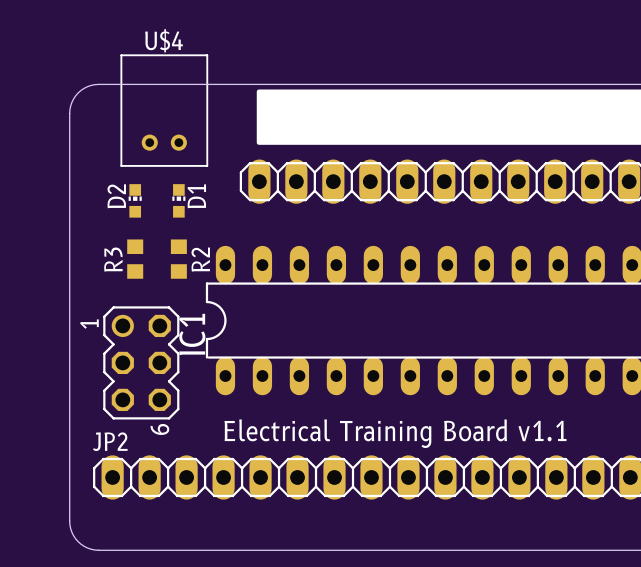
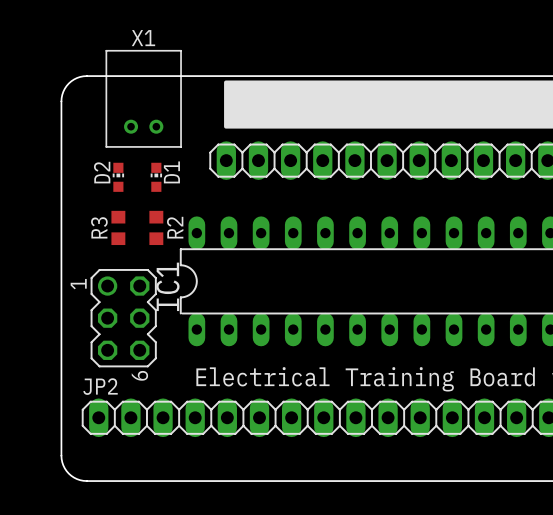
U$4 name: U$4 (164, 40) -> X1 (143, 38)

